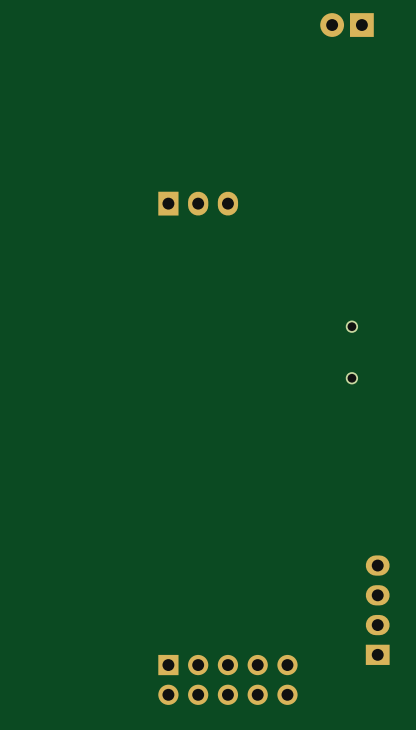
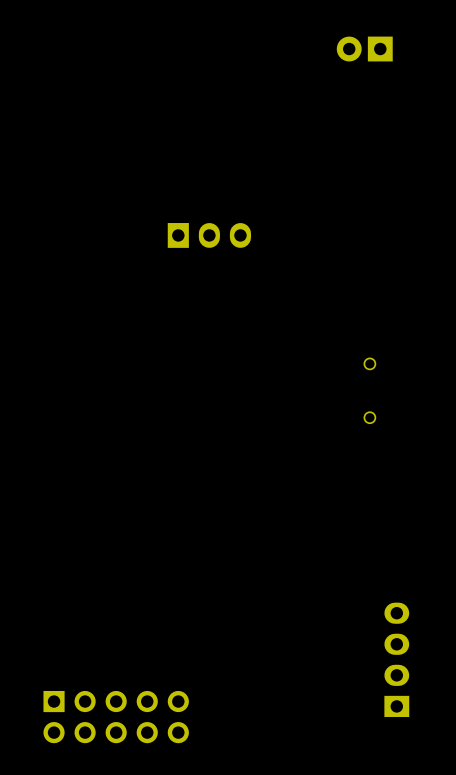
part position: (227, 679) -> (116, 717)

